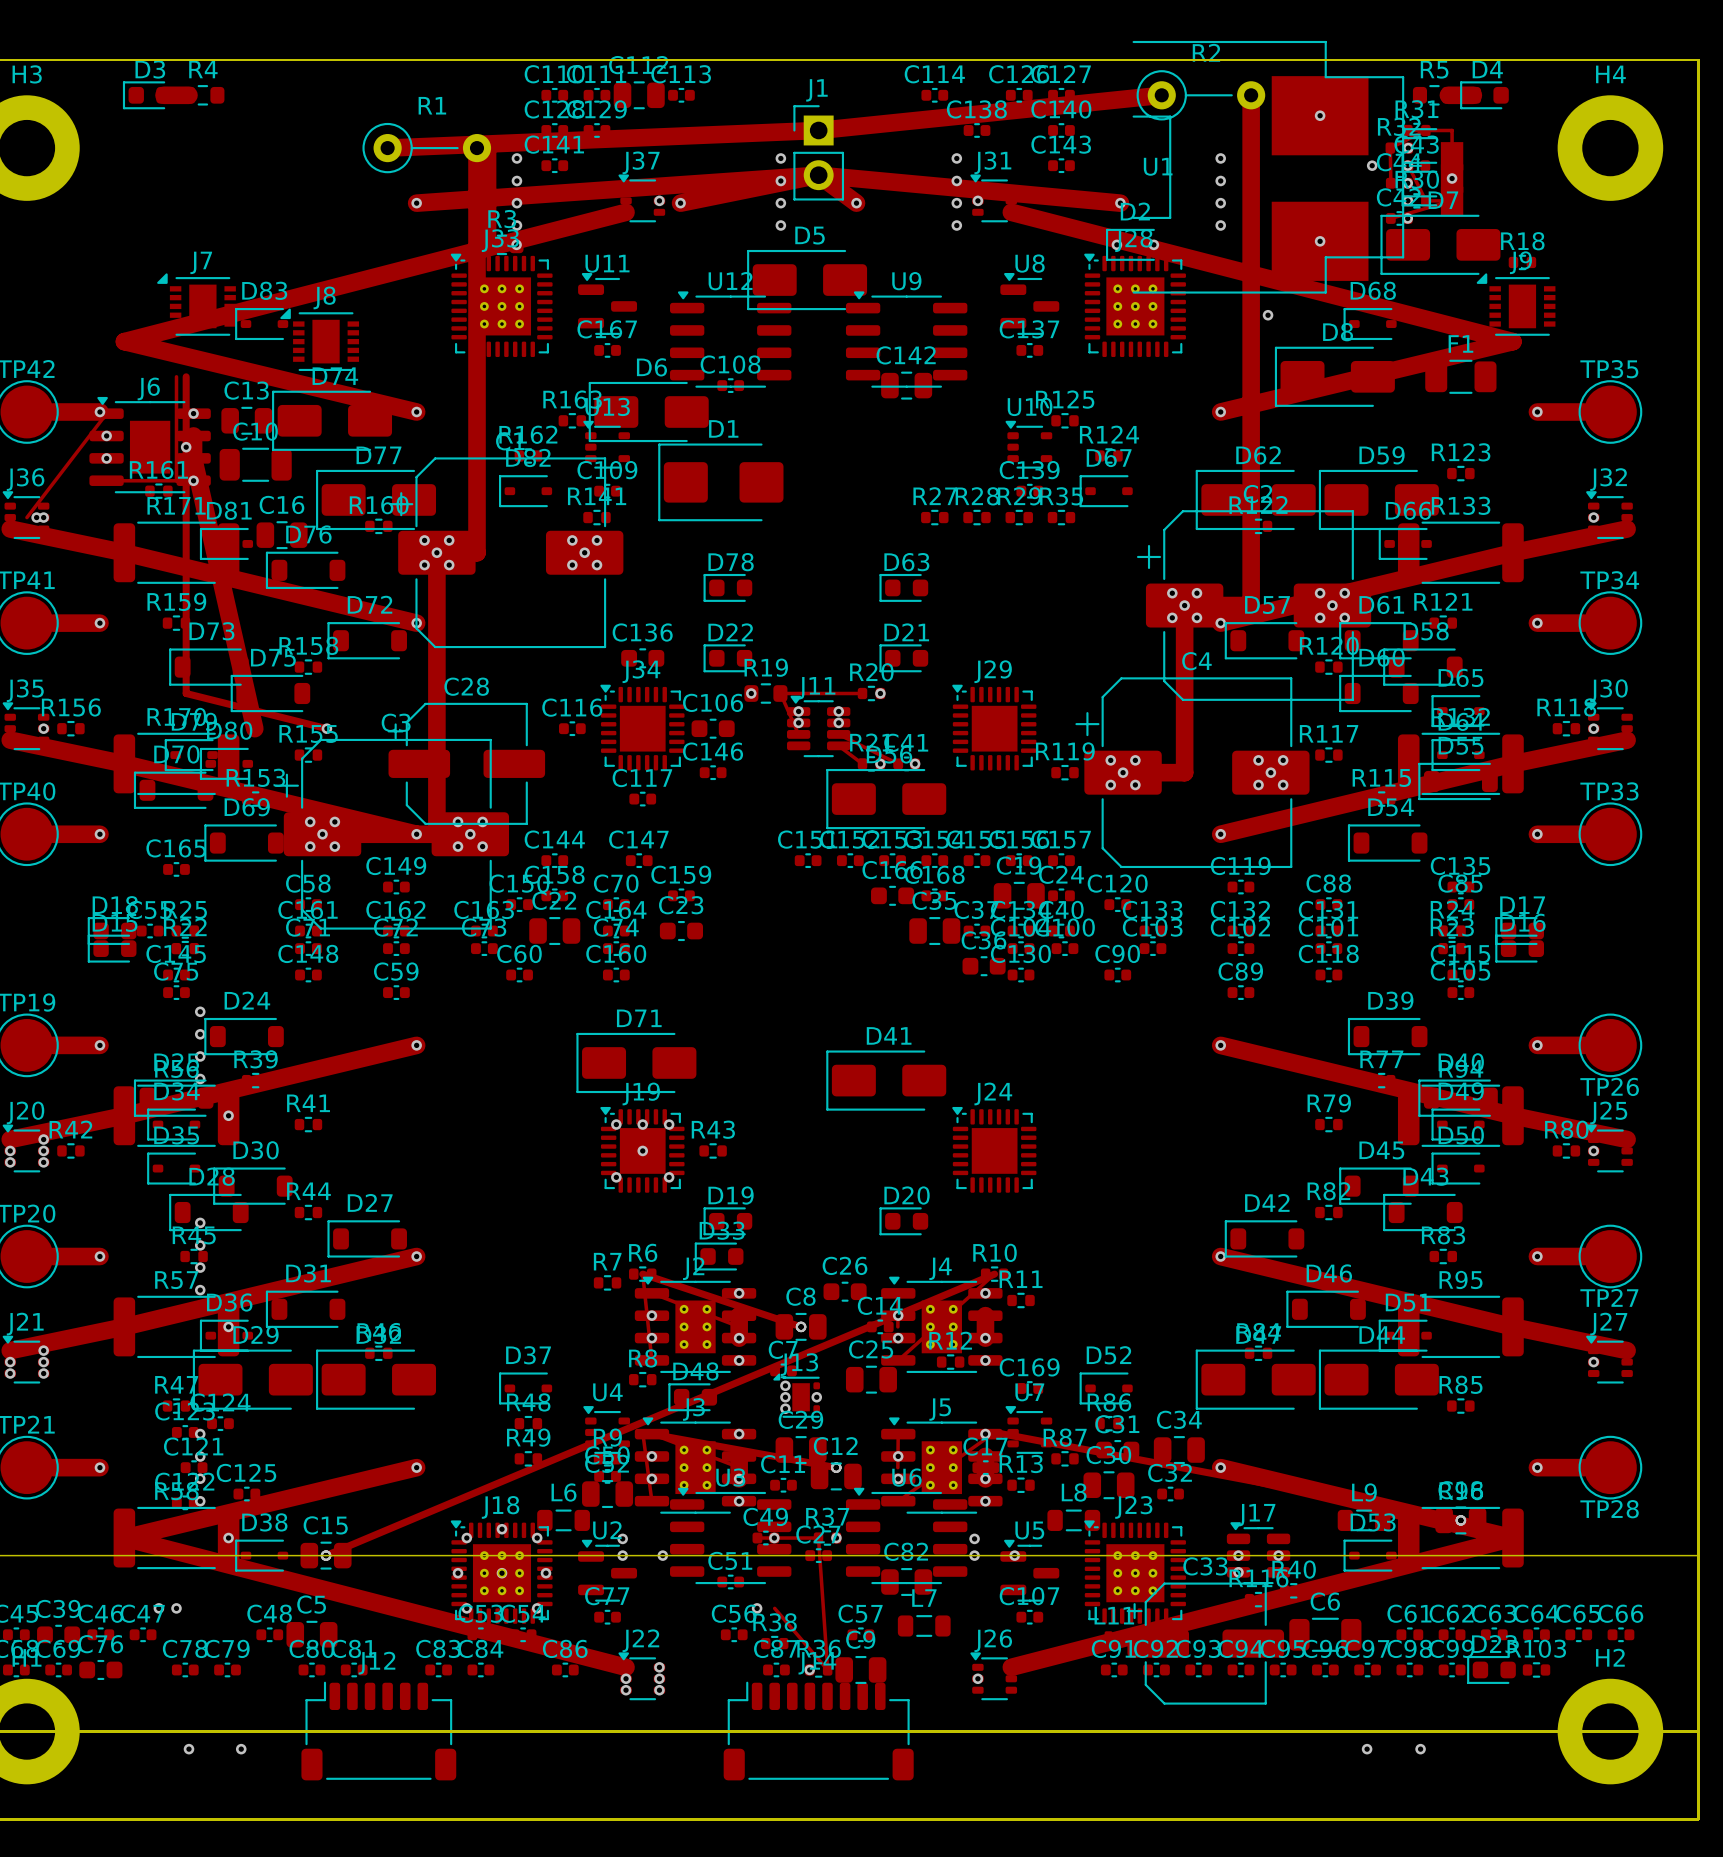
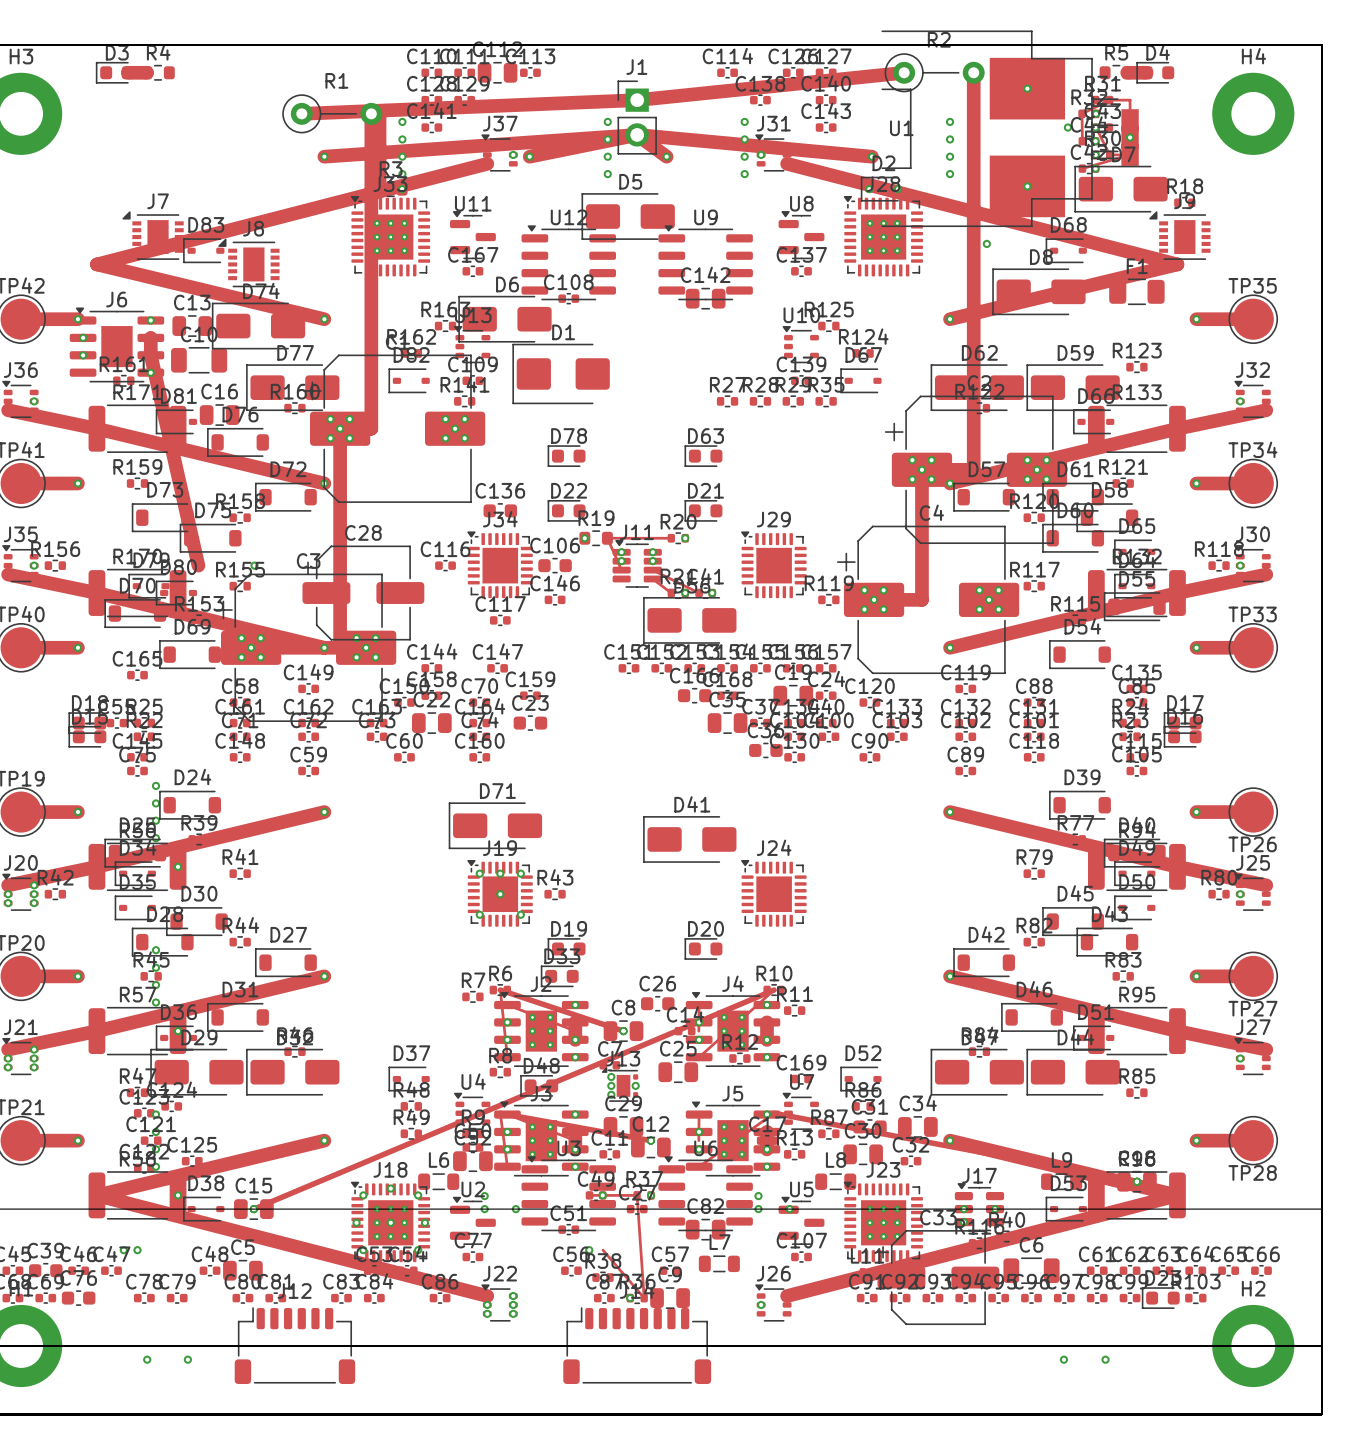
track: (176, 376) (176, 480) (106, 480) -> none
track: (186, 376) (186, 693) (326, 728) -> none
track: (106, 413) (26, 517) -> none
via: (186, 447) -> none
via: (36, 517) -> none

